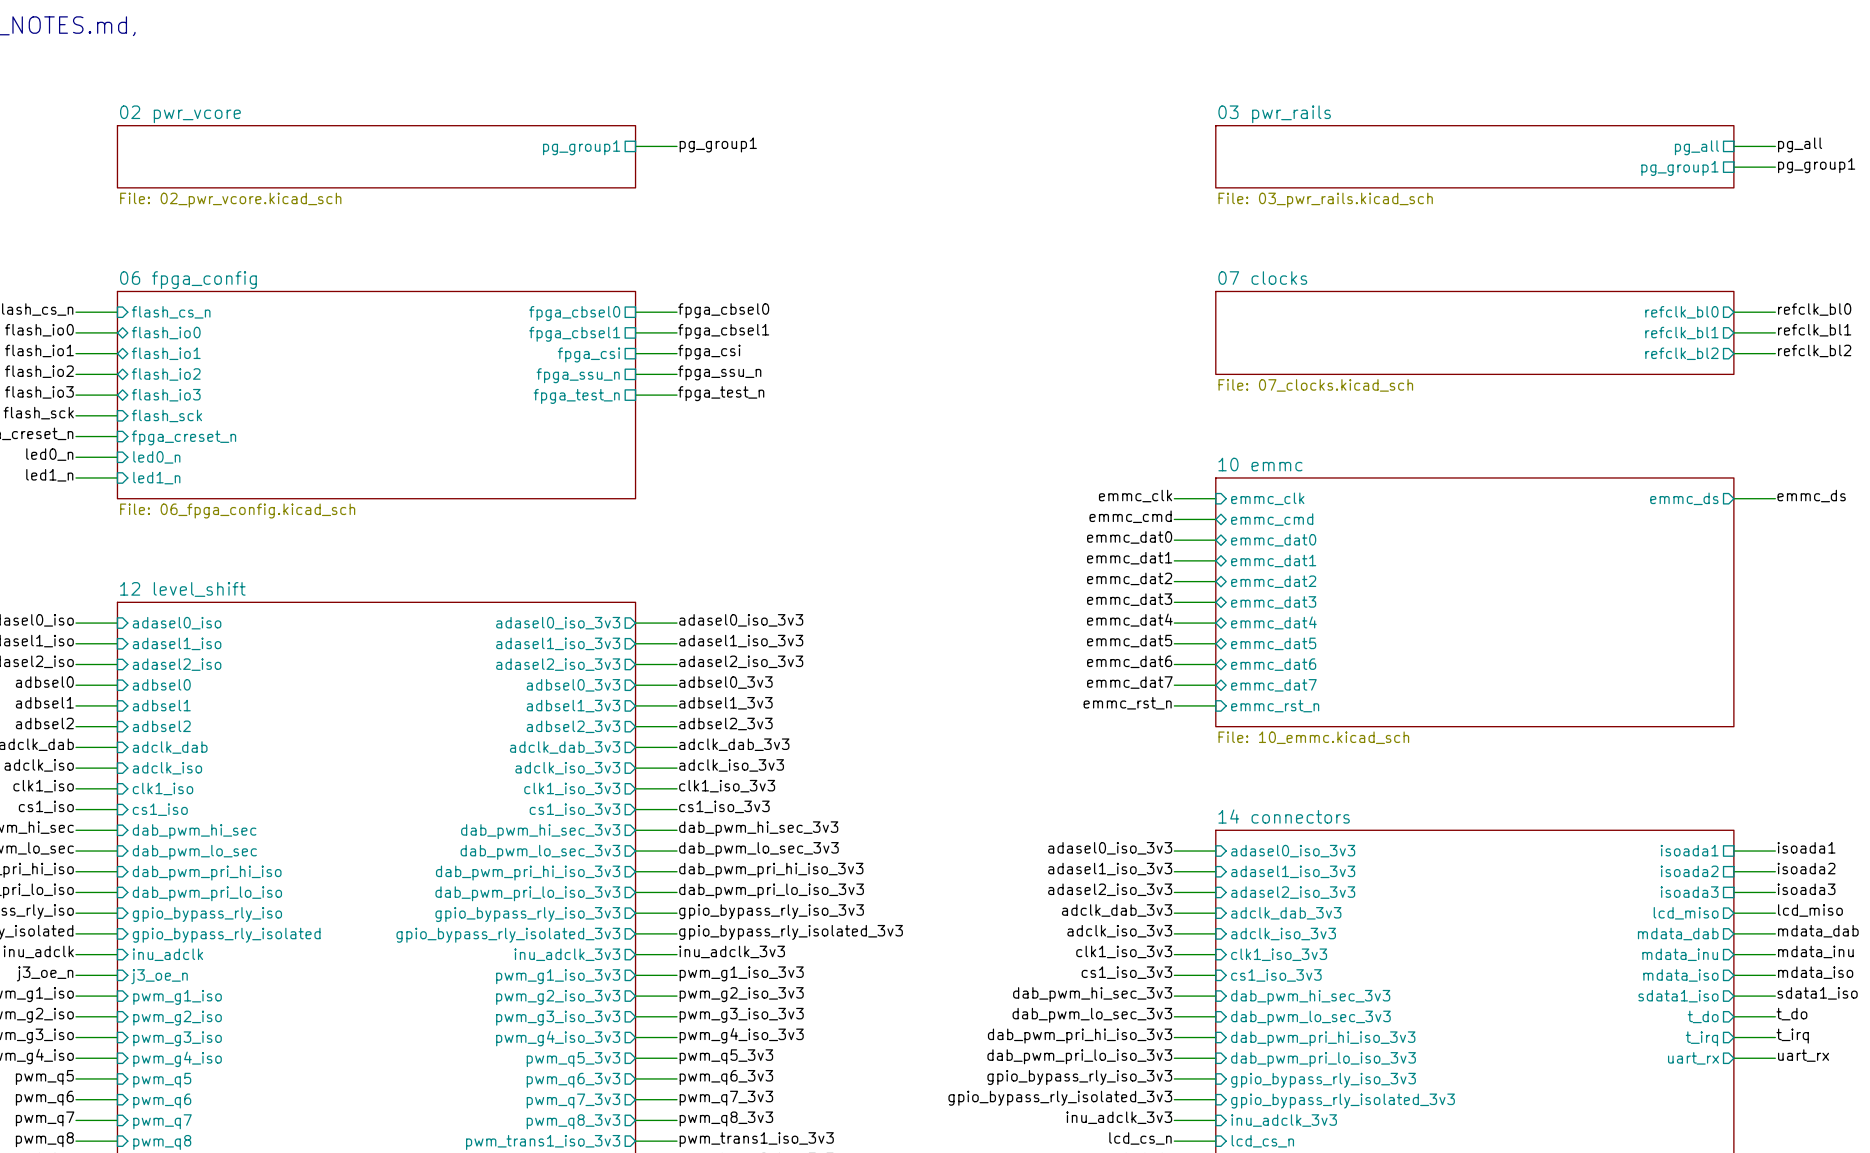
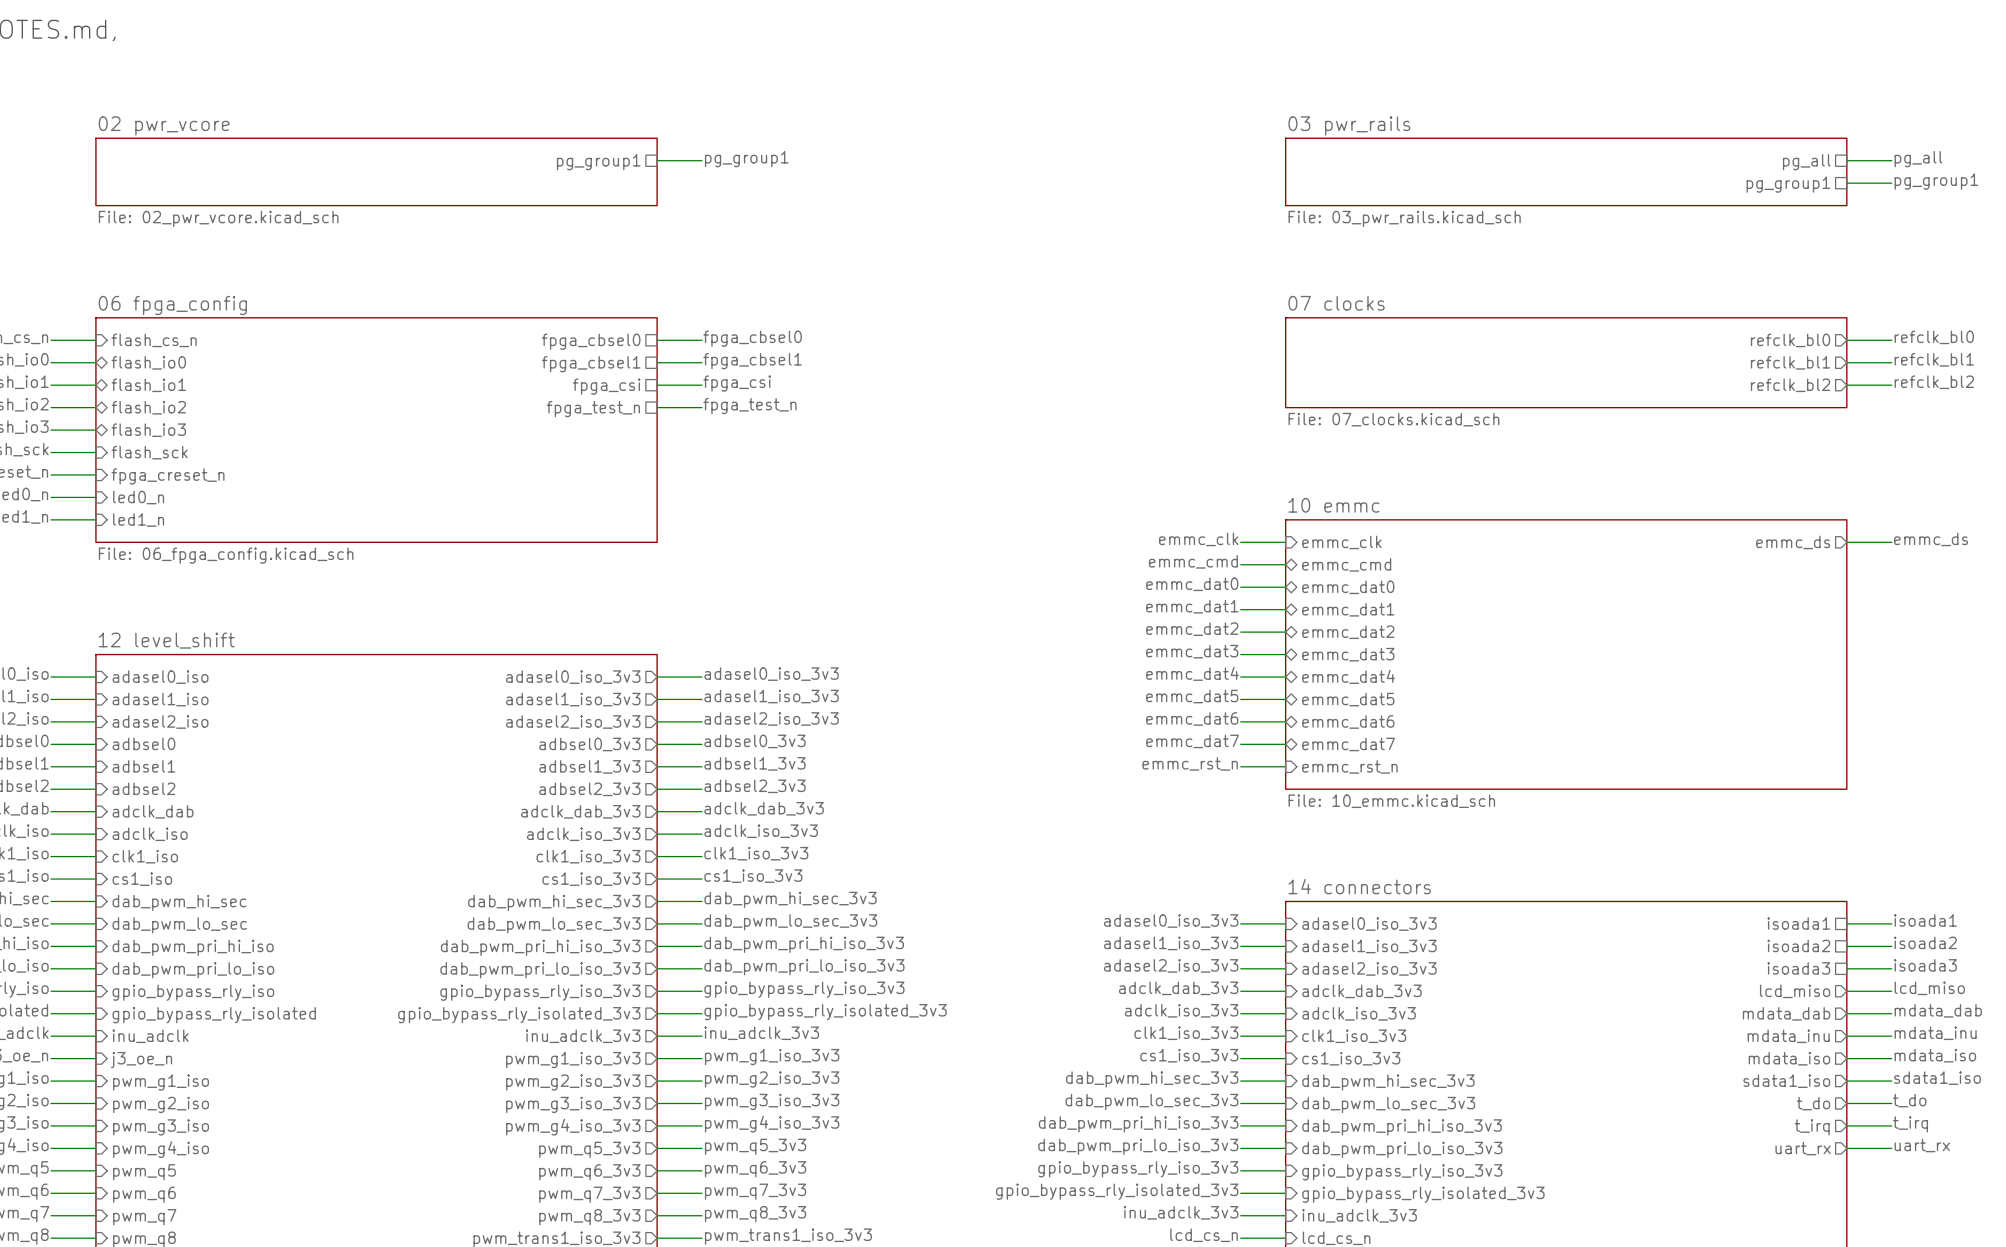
label: fpga_ssu_n (719, 372) -> fpga_test_n (749, 406)
sheet pin: fpga_ssu_n (578, 375) -> fpga_test_n (593, 409)
label: fpga_test_n (721, 393) -> none
wire: (635, 395) (676, 395) -> none
sheet pin: fpga_test_n (576, 396) -> none

